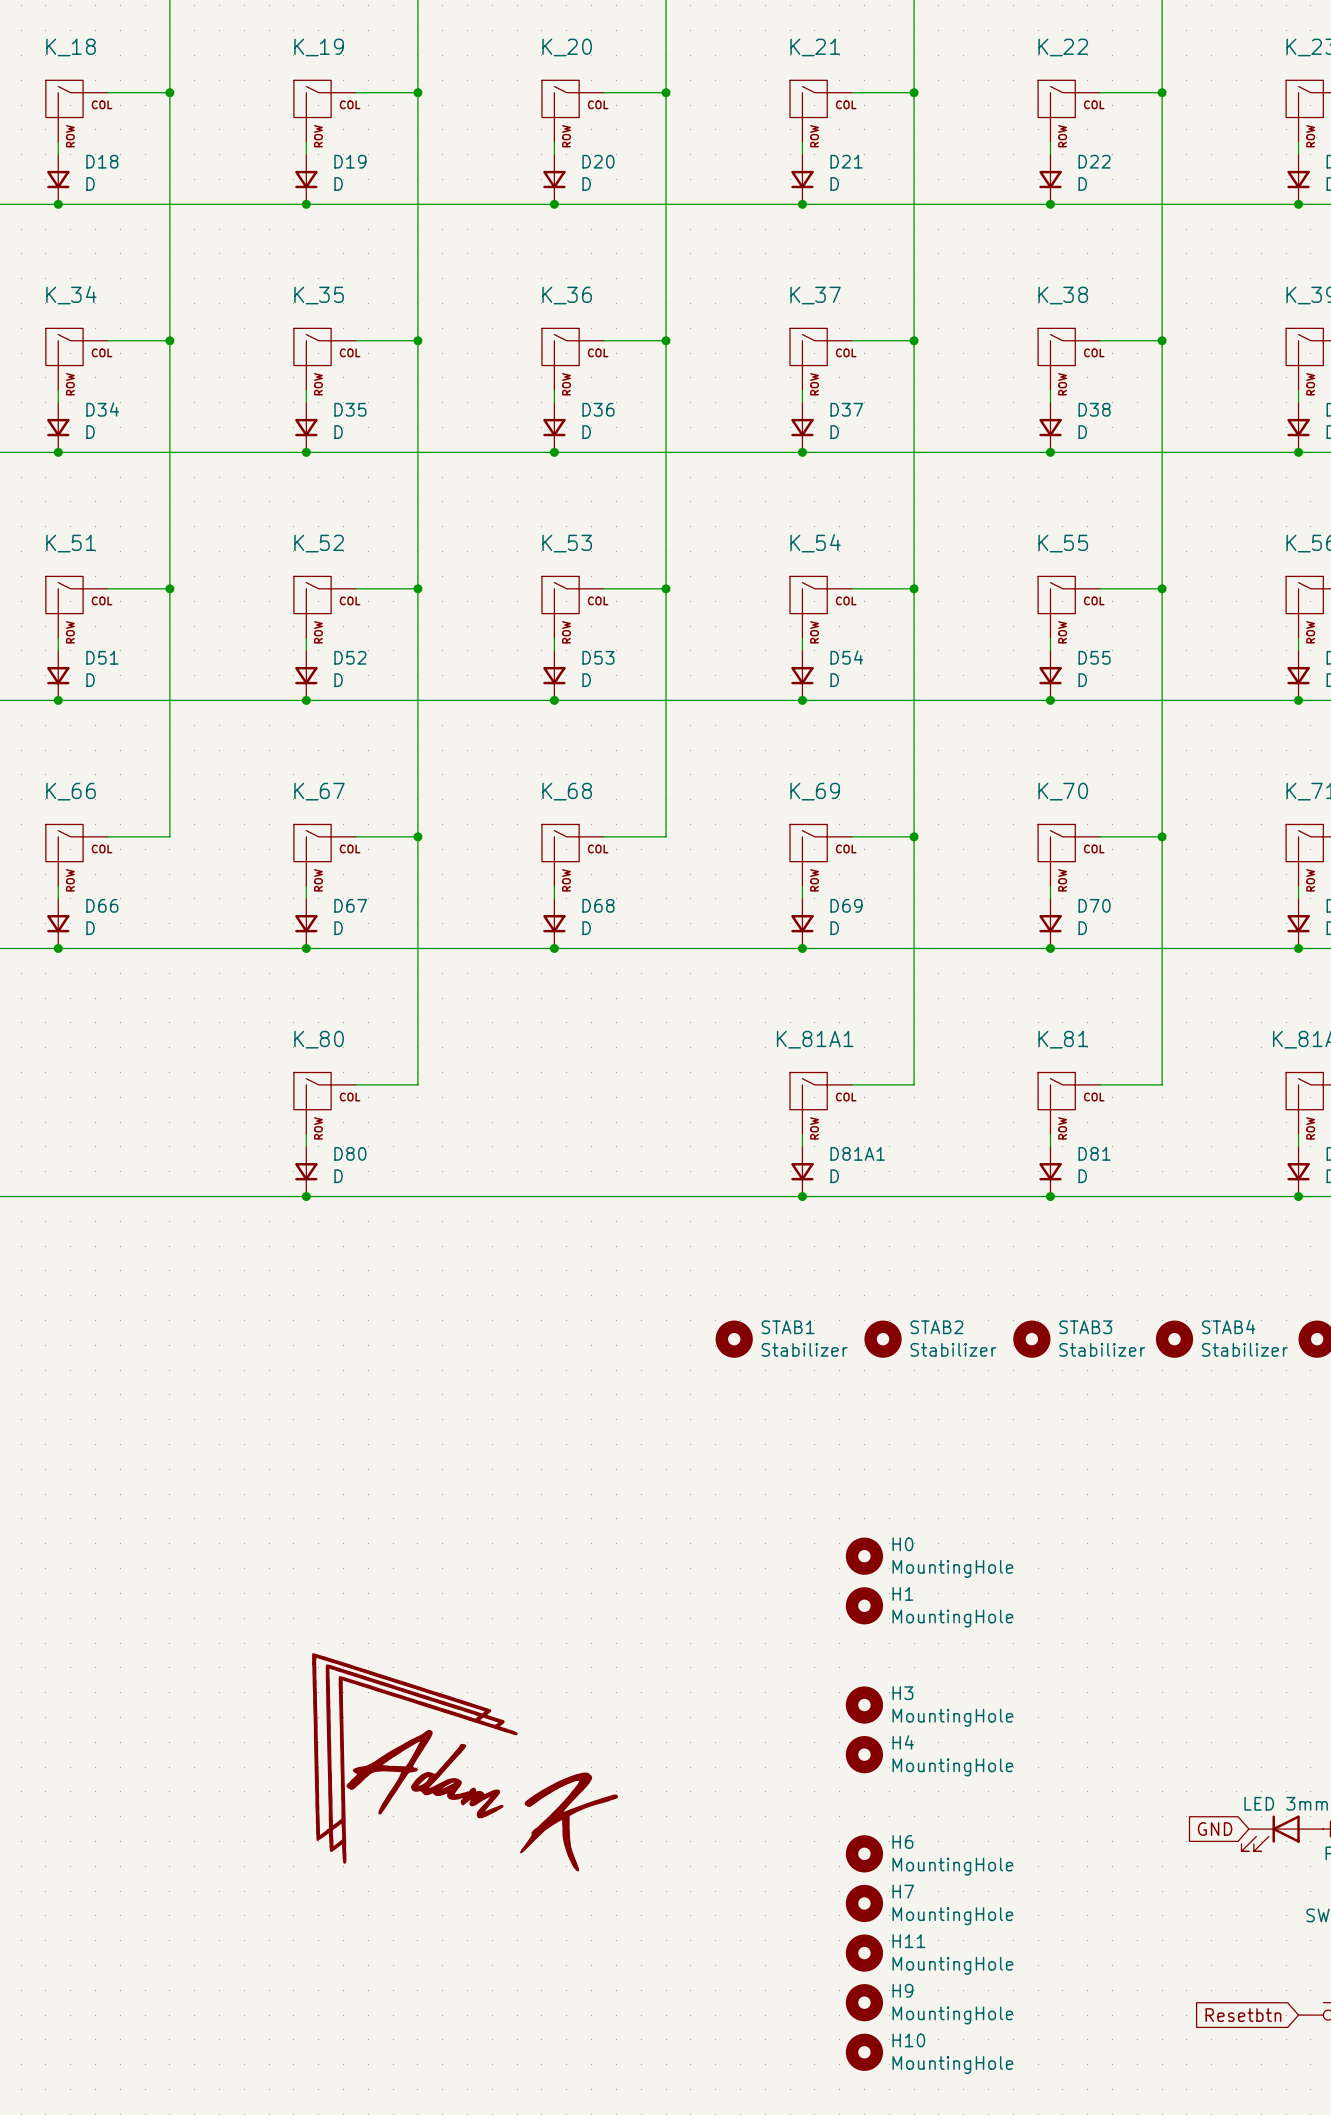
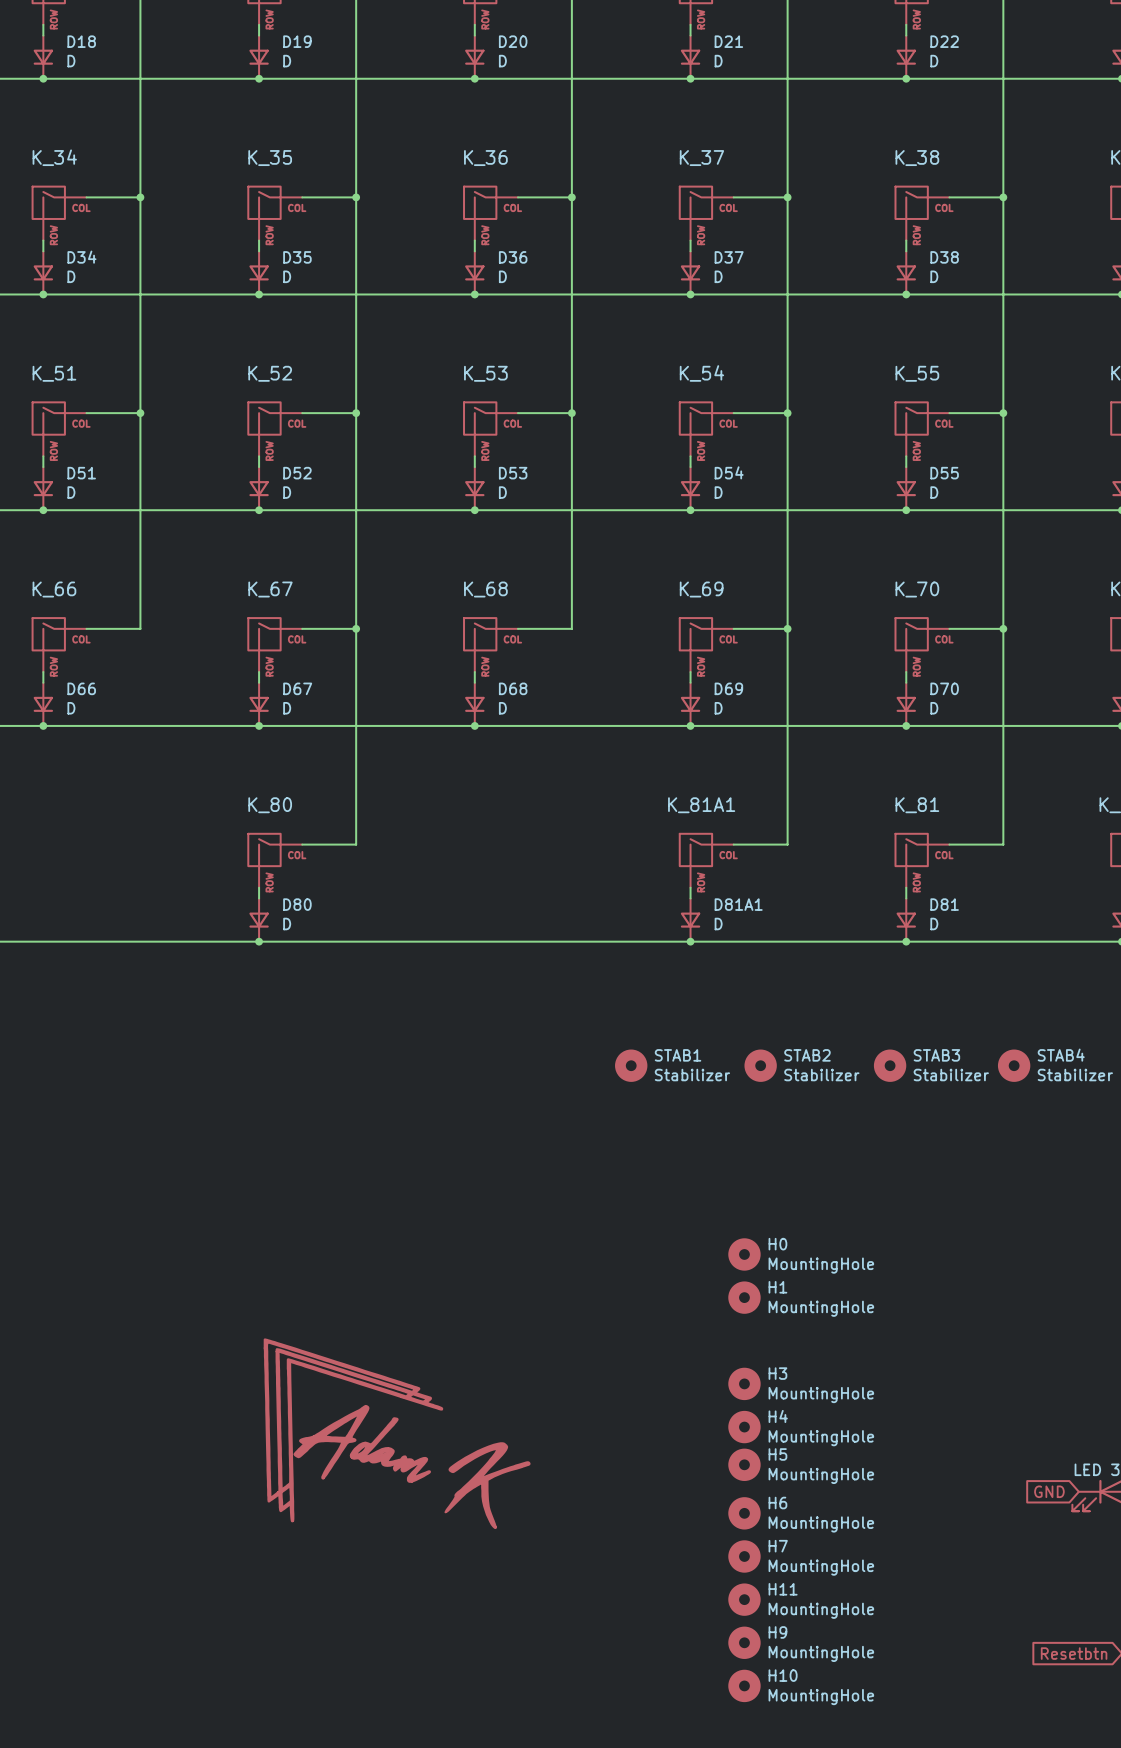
H5: none -> MountingHole (744, 1464)

